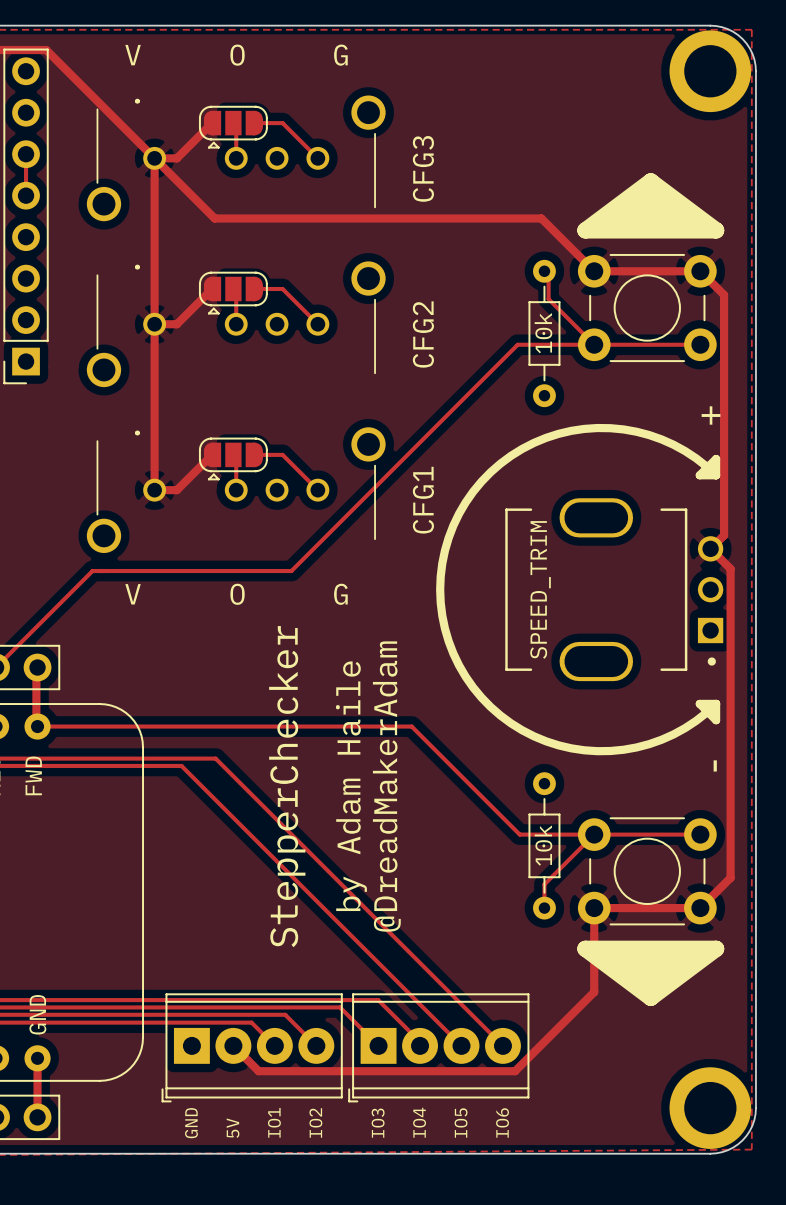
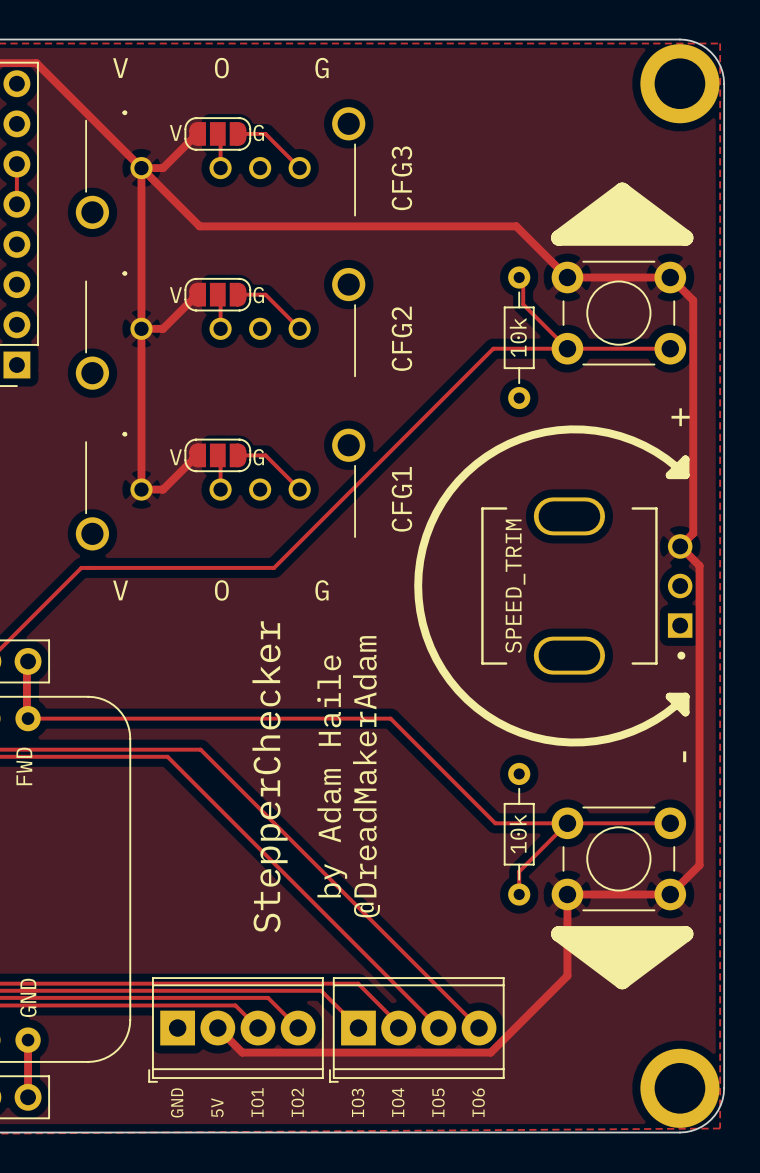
part footprint: [198, 105, 268, 149] -> [184, 117, 252, 151]
text: none -> V (175, 132)
text: none -> G (258, 132)
part footprint: [198, 271, 268, 315] -> [184, 277, 252, 312]
text: none -> V (175, 295)
text: none -> G (258, 295)
part footprint: [198, 437, 268, 481] -> [184, 438, 252, 473]
text: none -> V (175, 457)
text: none -> G (258, 457)

